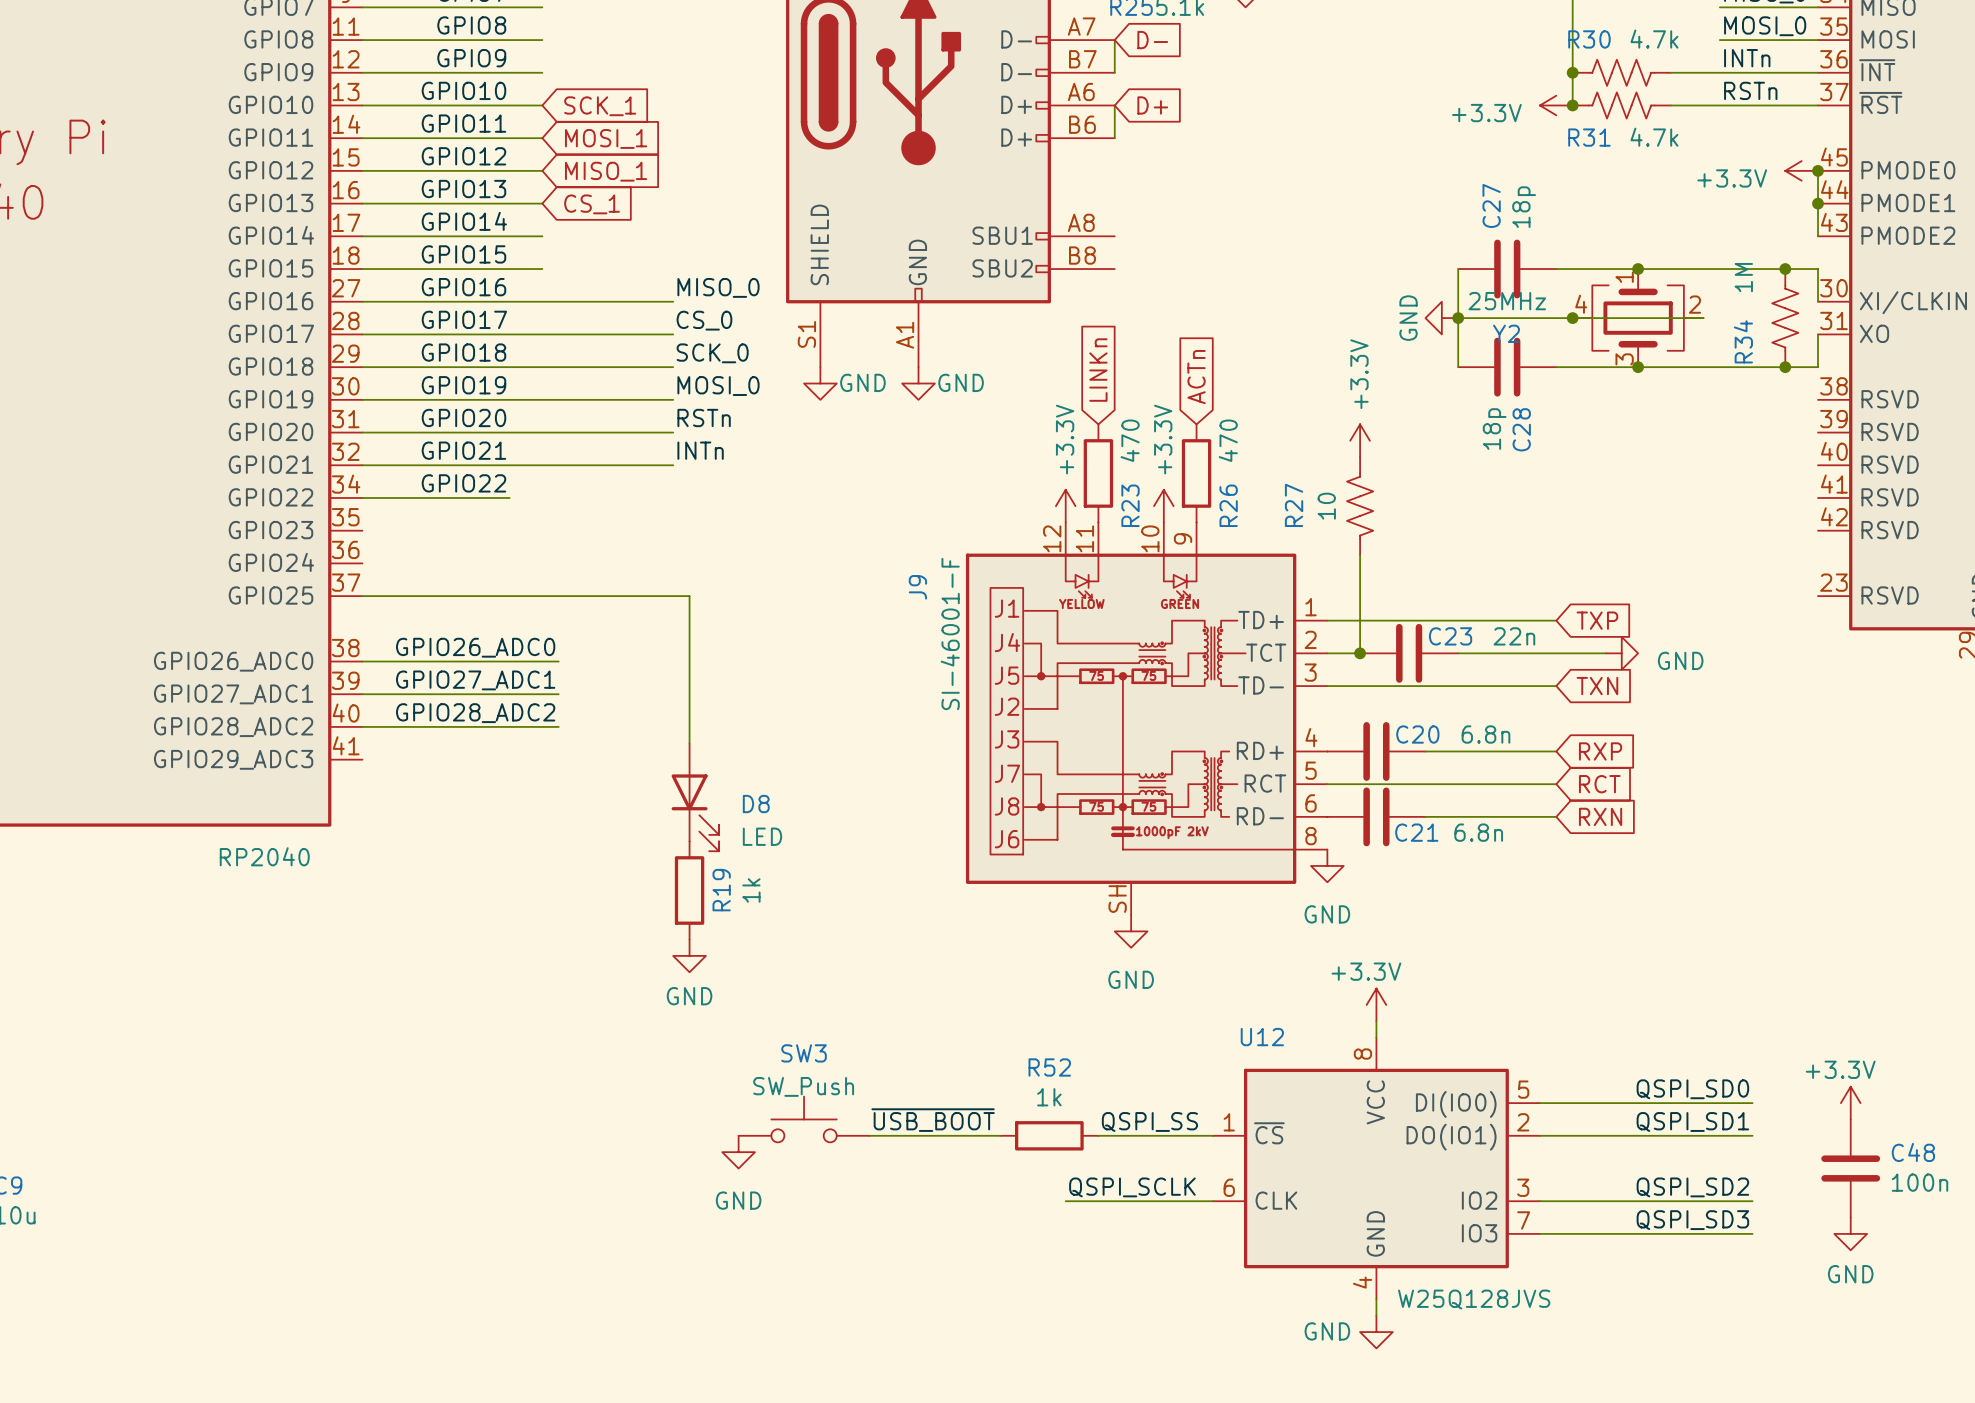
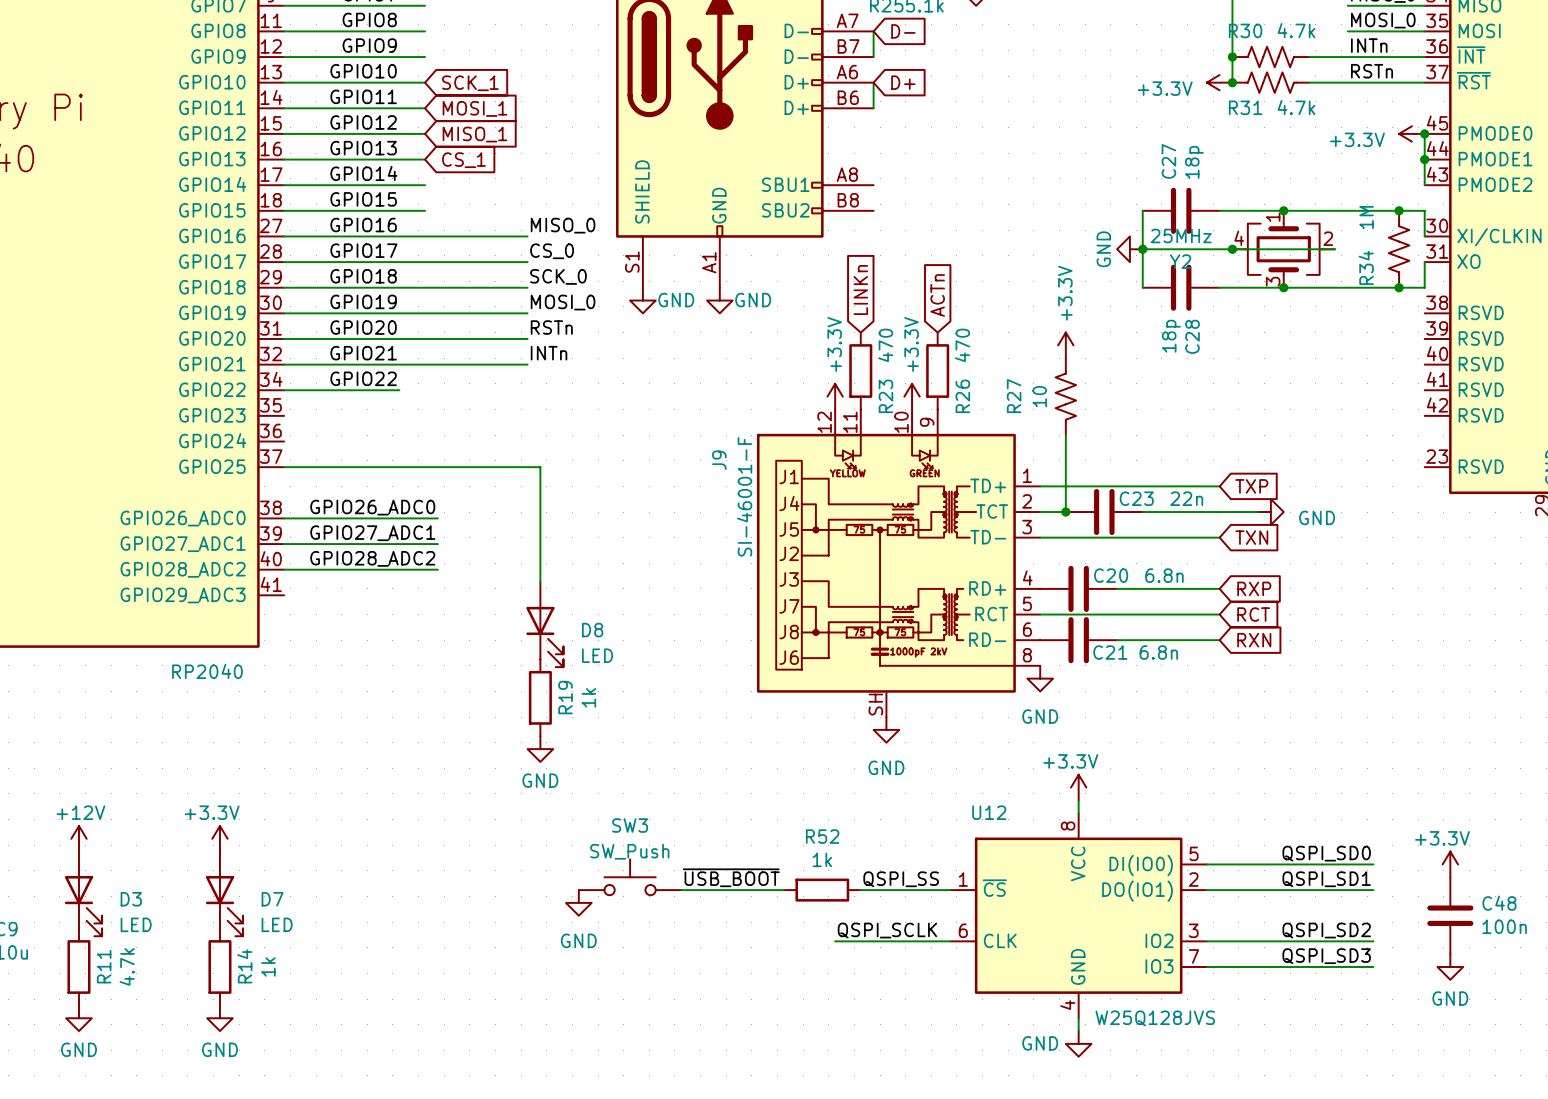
power symbol: none -> +12V (78, 838)
power symbol: none -> +3.3V (219, 838)
D3: none -> LED (83, 893)
D7: none -> LED (224, 893)
R11: none -> 4.7k (78, 966)
R14: none -> 1k (219, 966)
power symbol: none -> GND (78, 1018)
power symbol: none -> GND (219, 1018)

